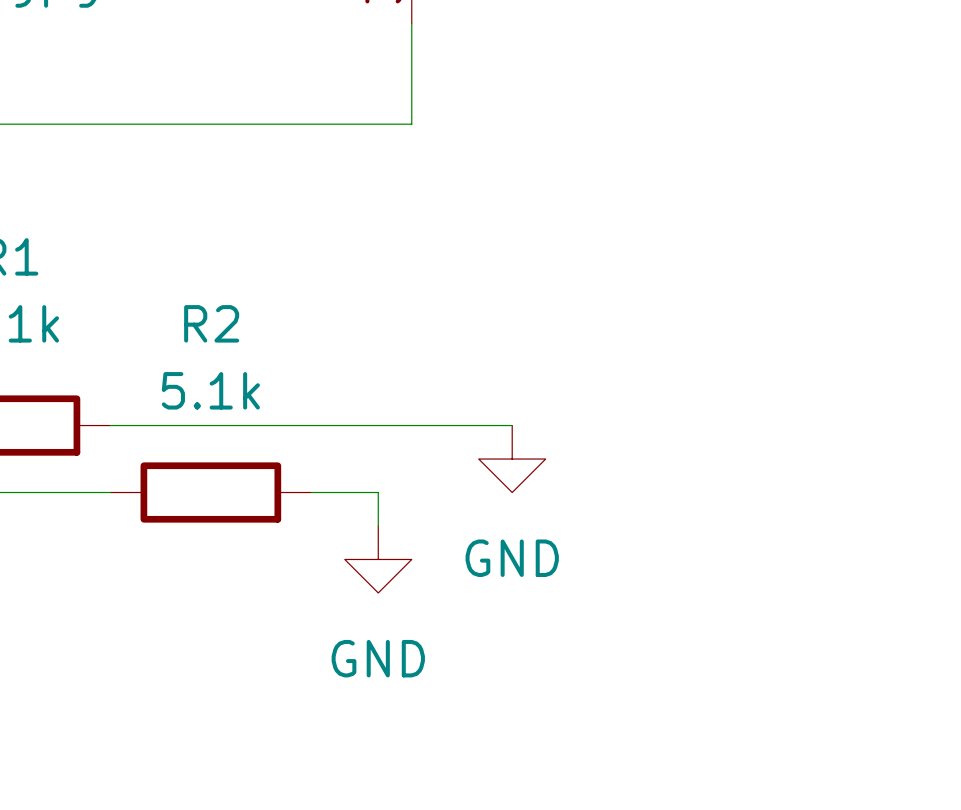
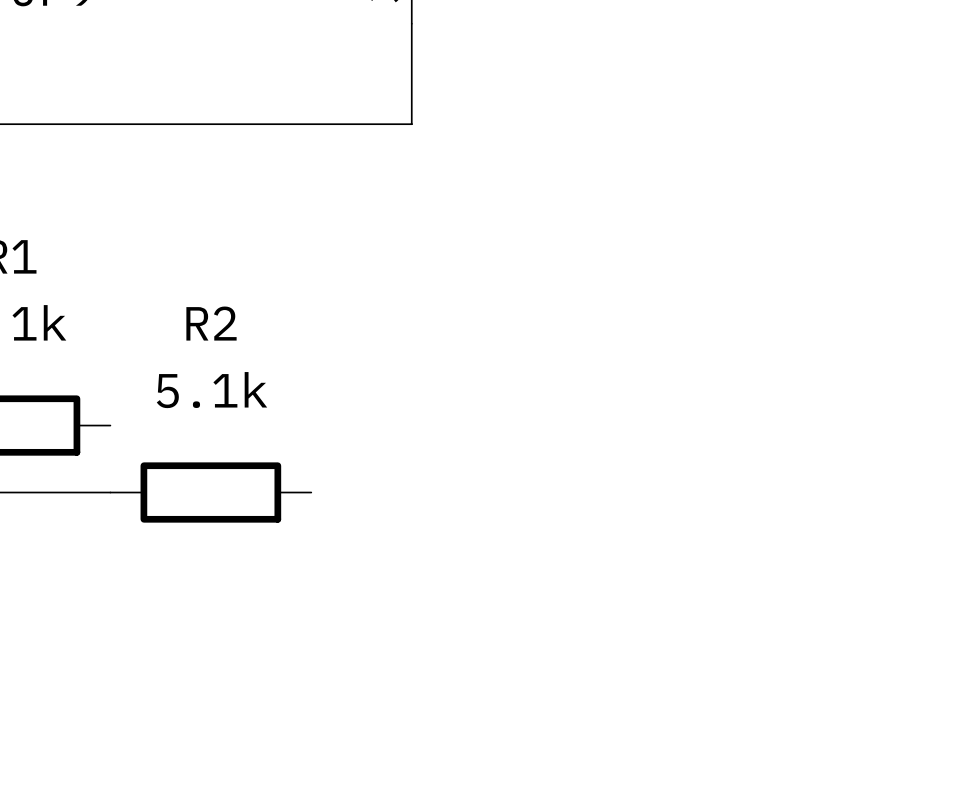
wire: (110, 425) (512, 425) -> none
power symbol: GND (512, 459) -> none
wire: (311, 492) (378, 492) (378, 525) -> none
power symbol: GND (378, 559) -> none

